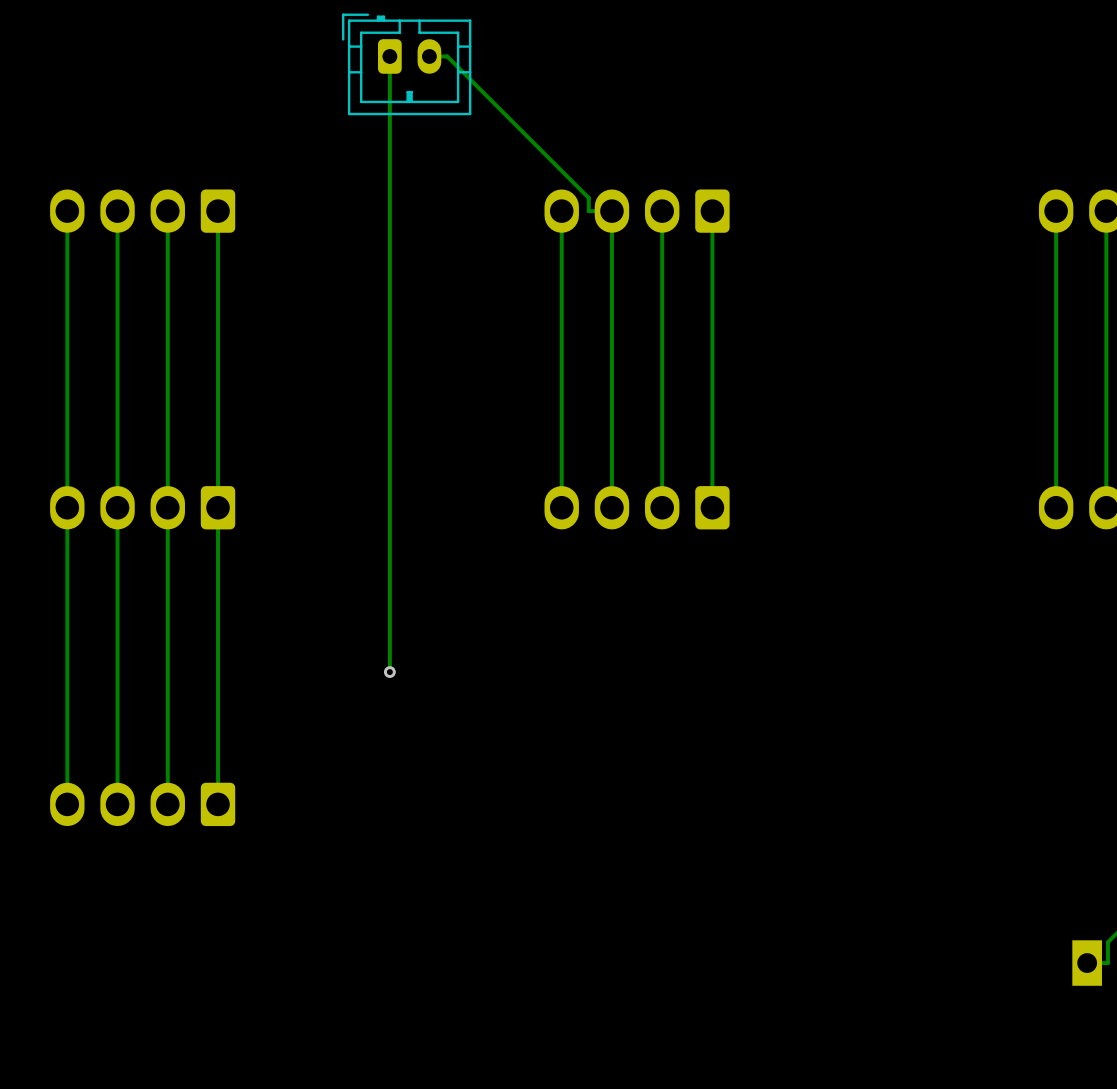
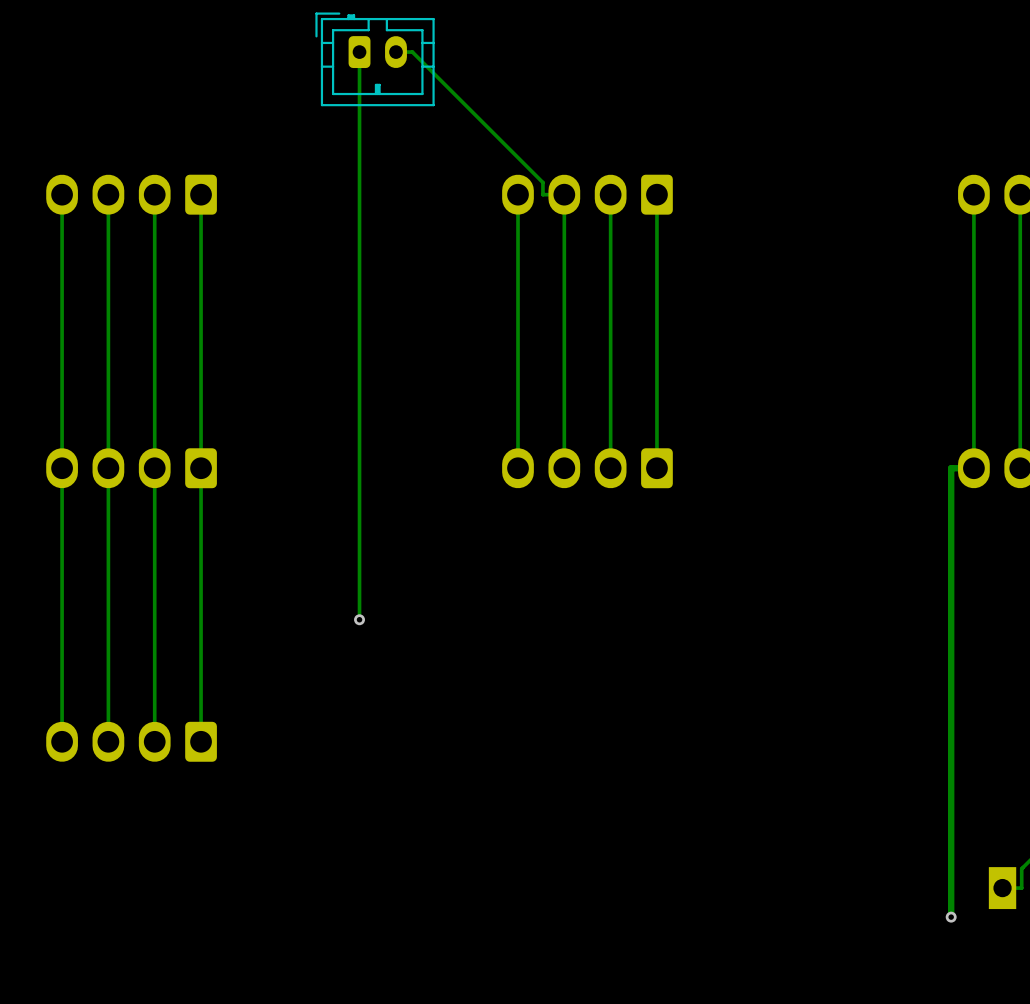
track: none -> (973, 468) (951, 468) (951, 917)
via: none -> (951, 917)

